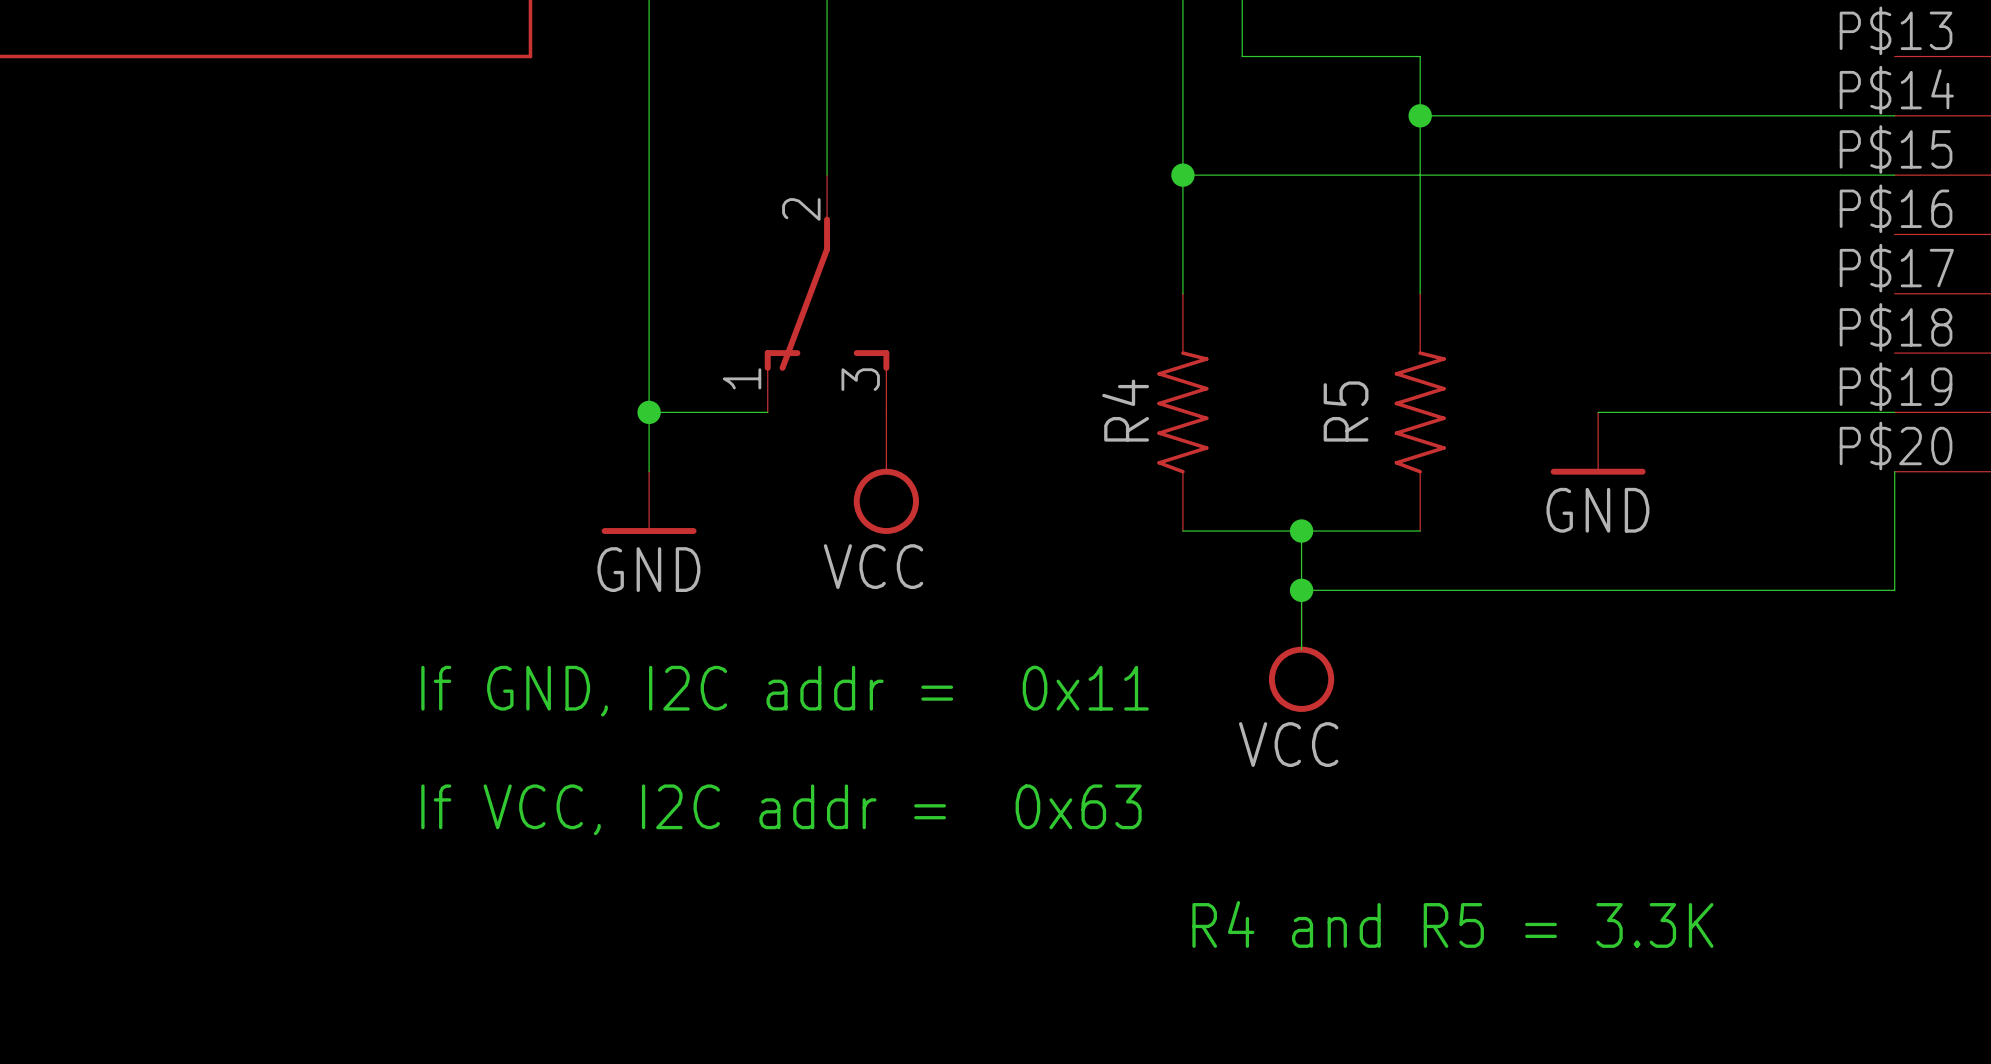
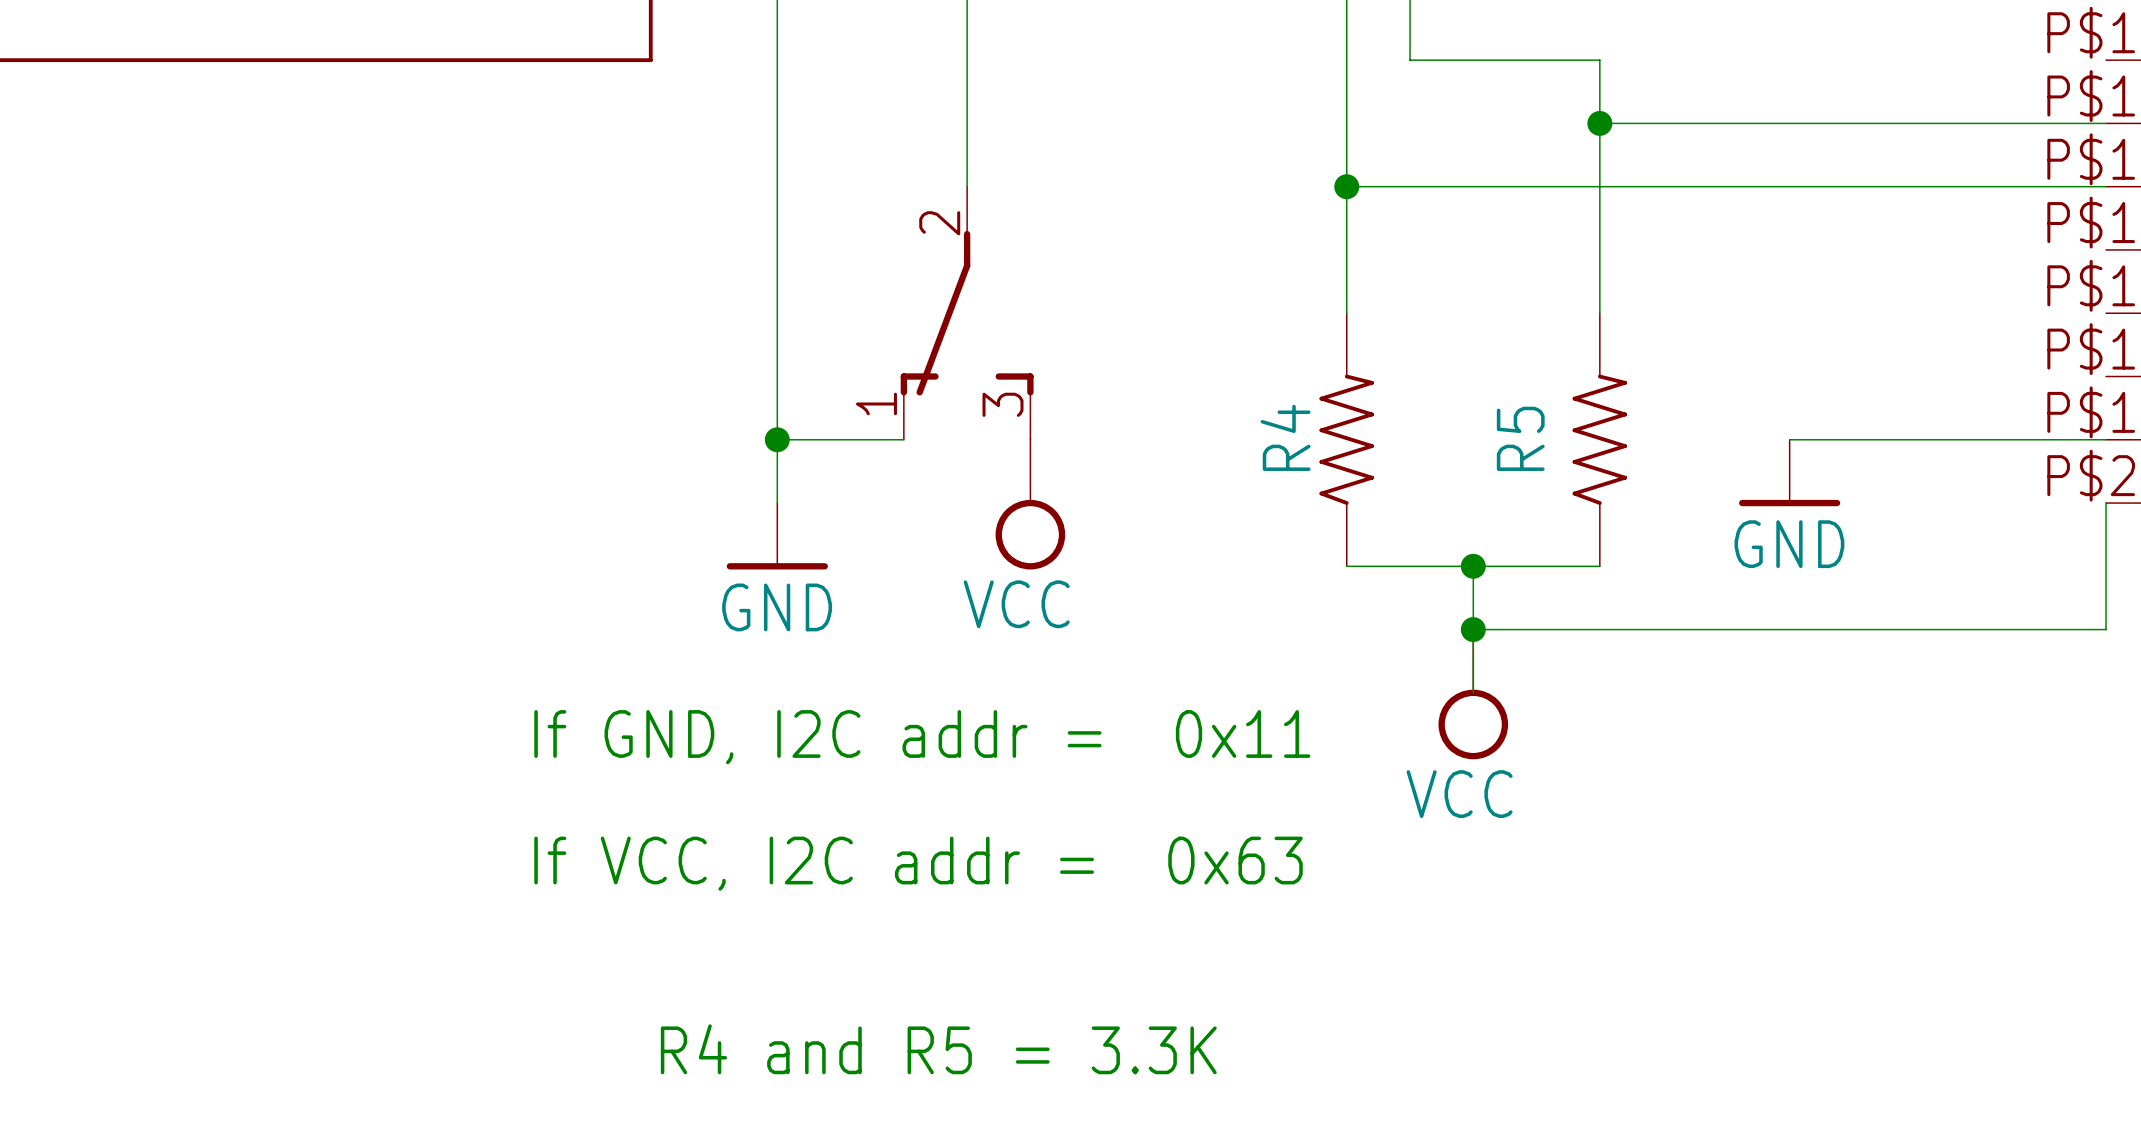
text: R4 and R5 = 3.3K (1452, 924) -> none
text: none -> R4 and R5 = 3.3K (938, 1049)

